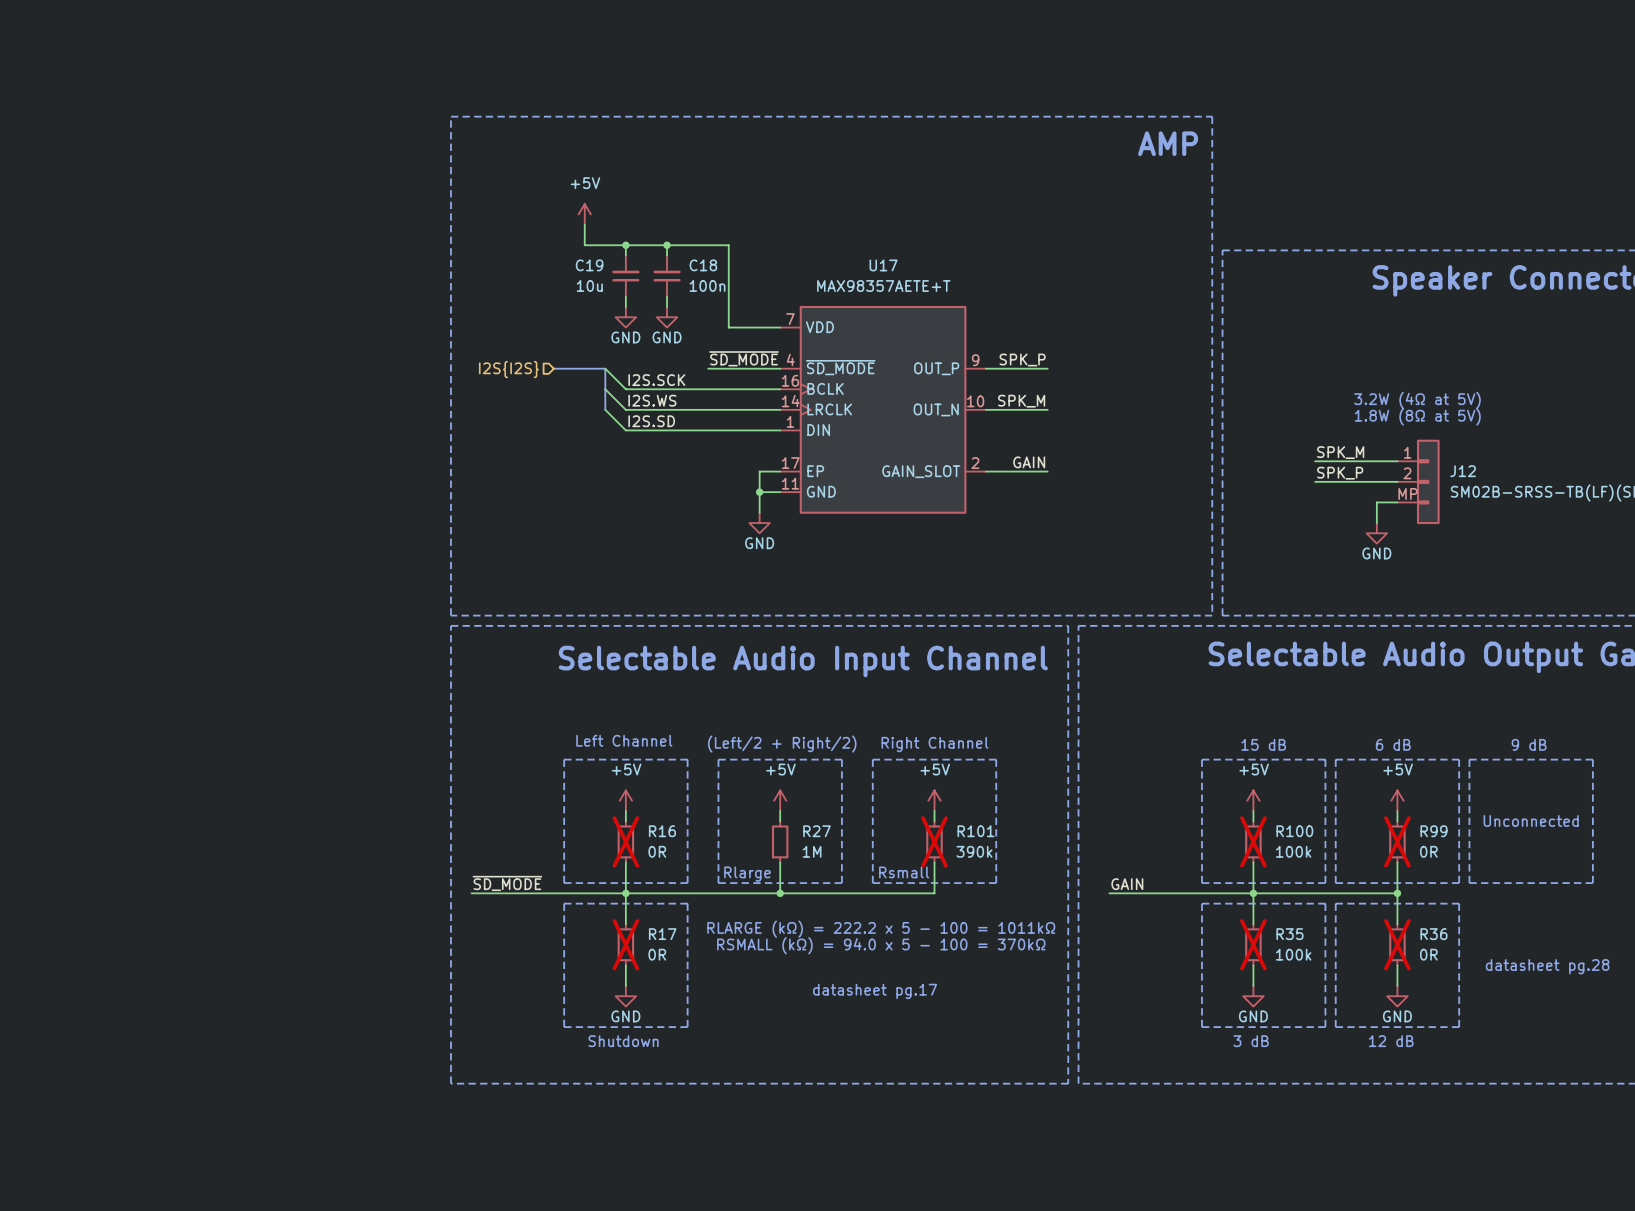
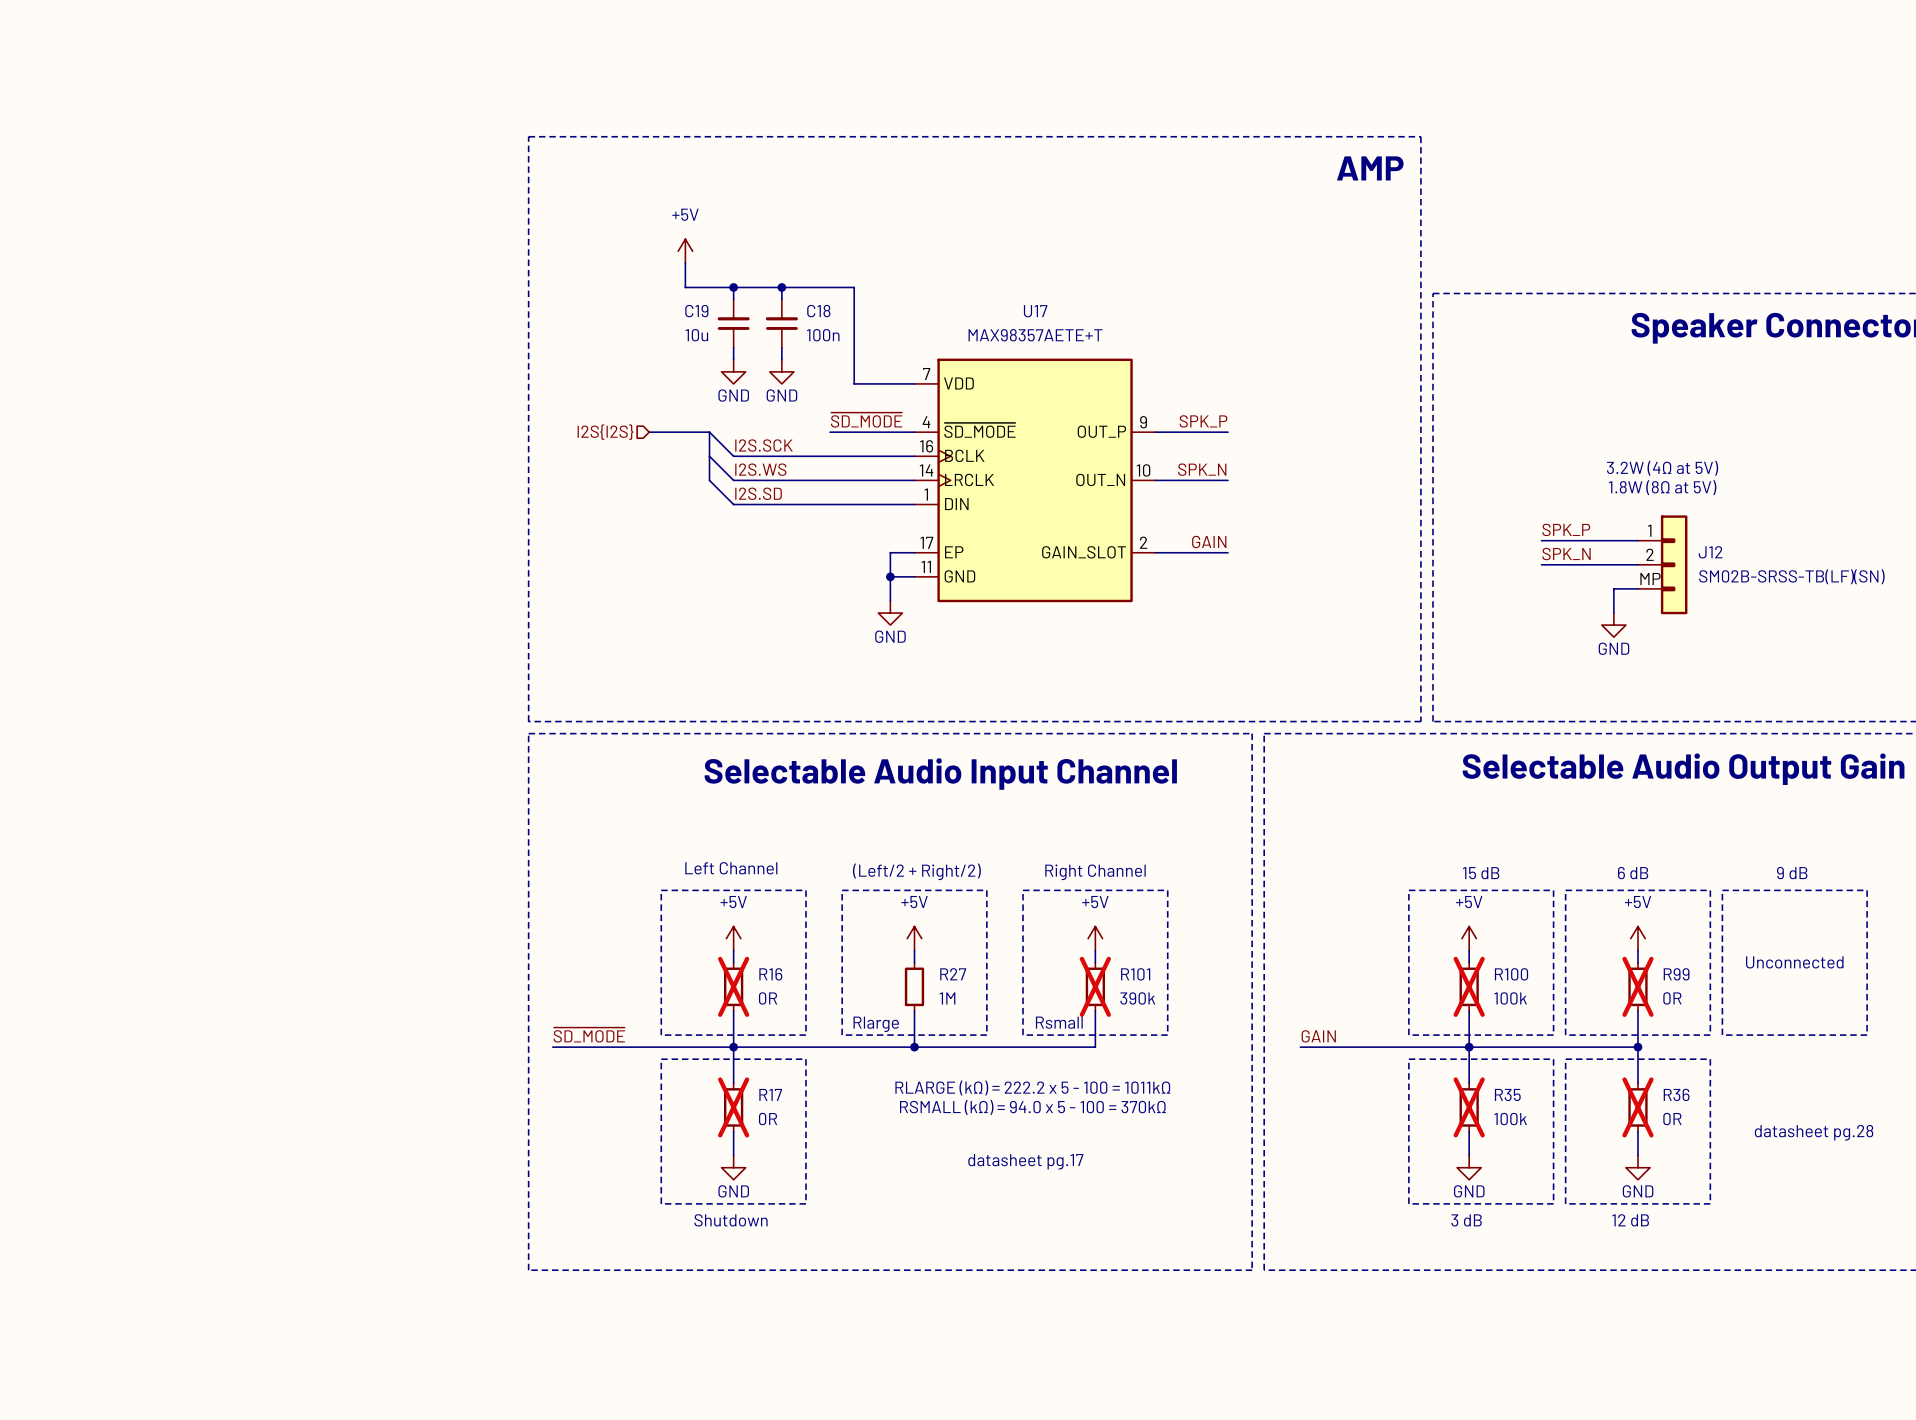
label: SPK_M (1021, 401) -> SPK_N (1202, 469)
label: SPK_M (1340, 452) -> SPK_P (1566, 529)
label: SPK_P (1340, 473) -> SPK_N (1566, 554)

